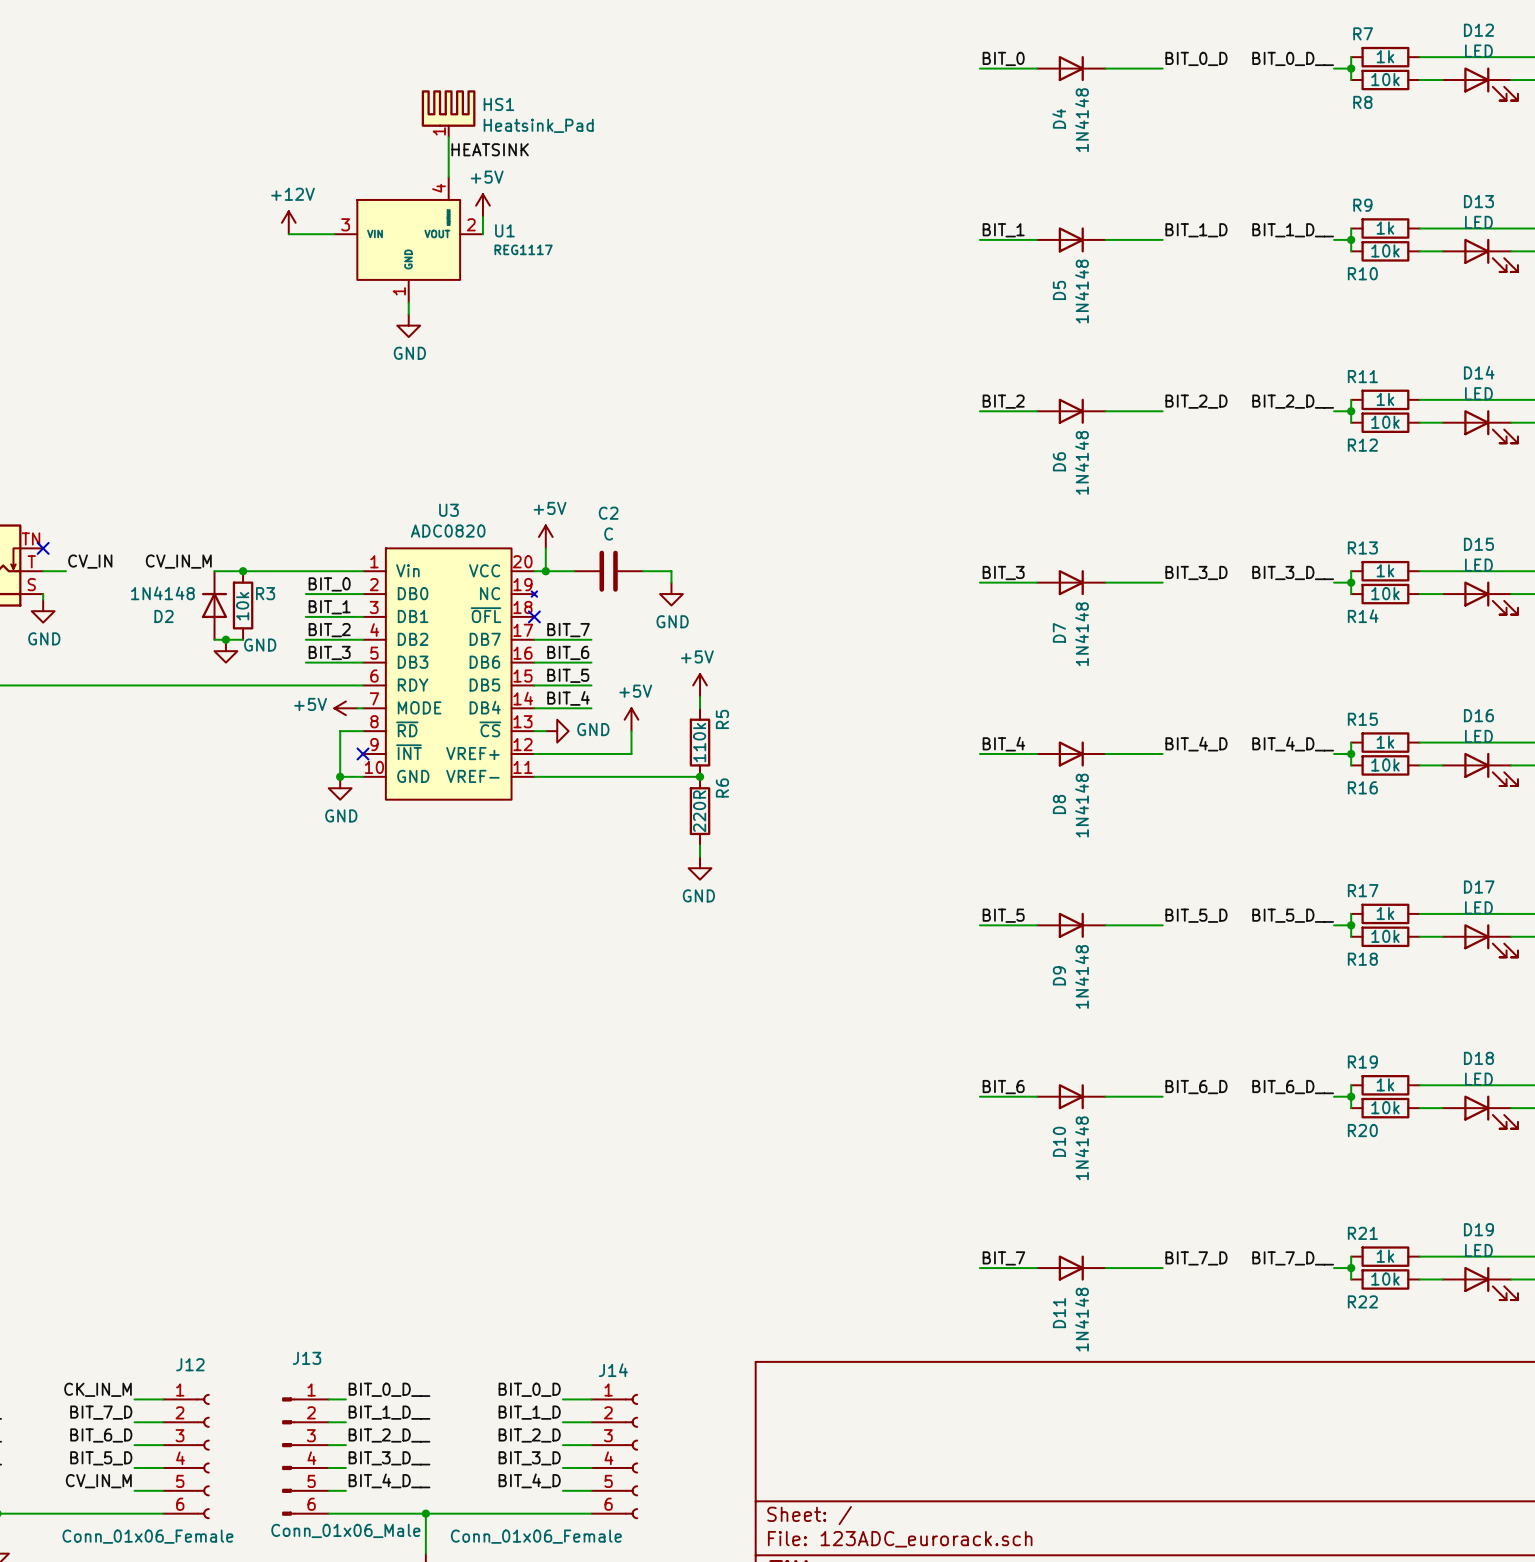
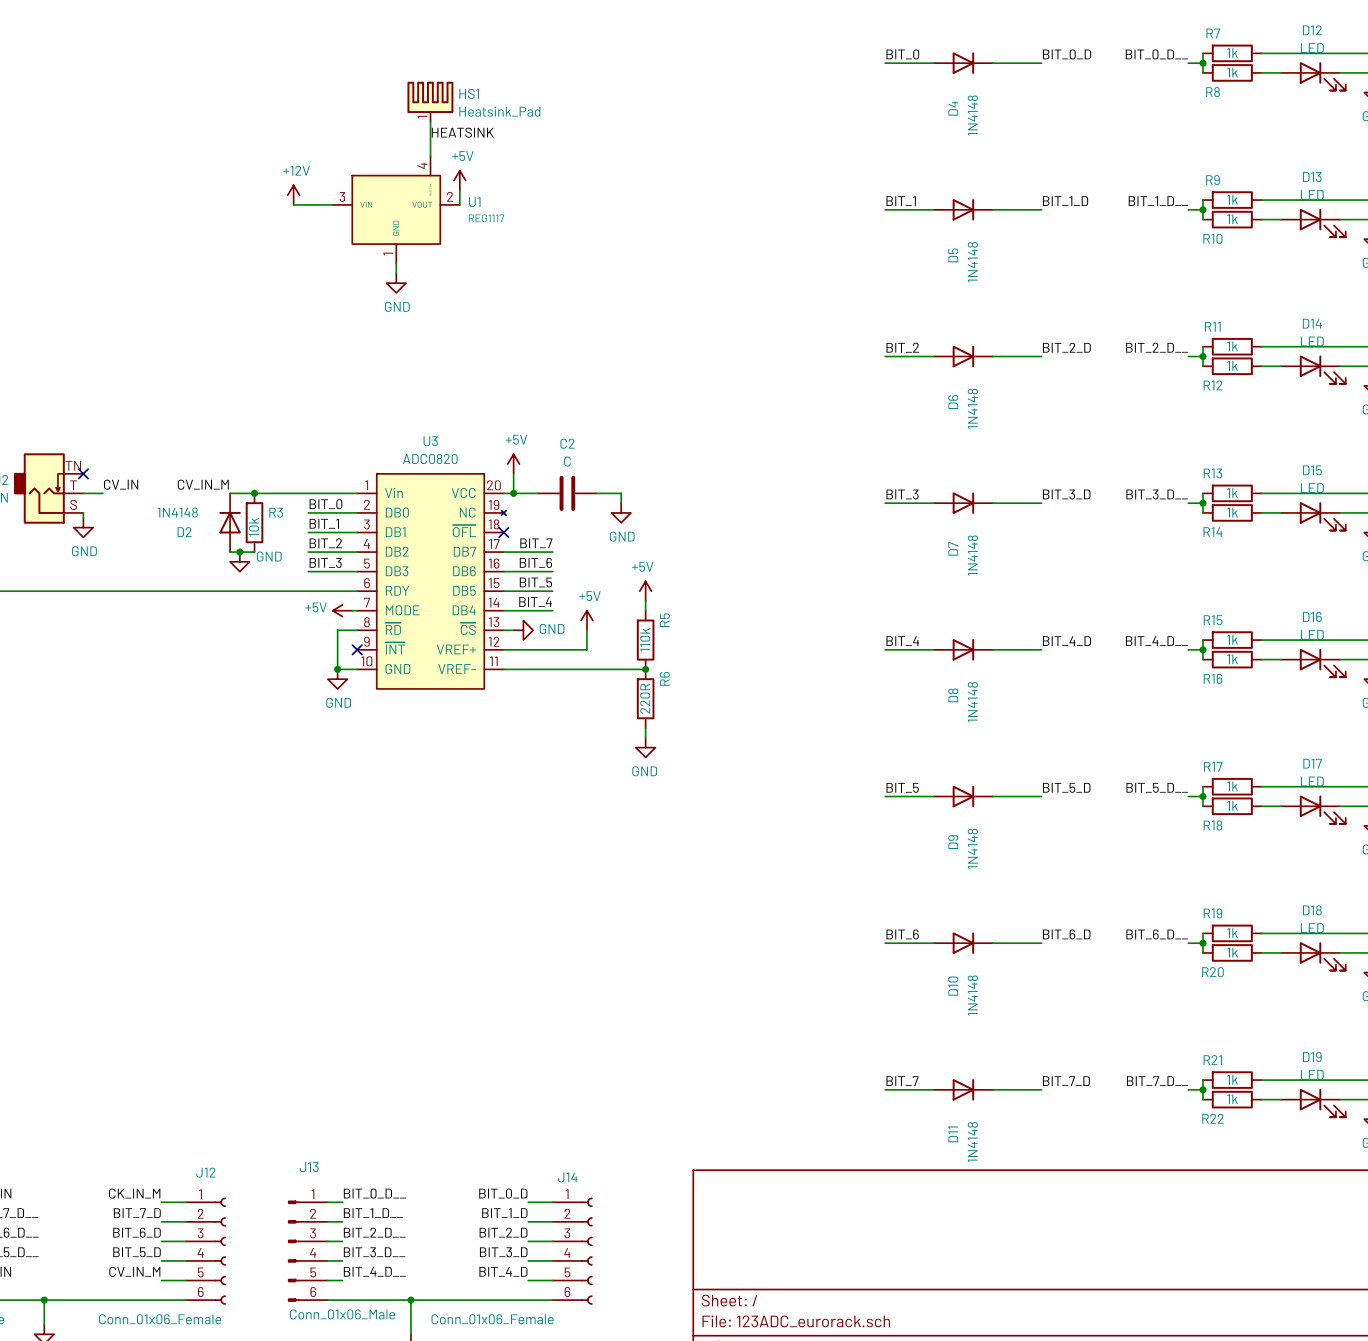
R8 value: 10k (1385, 79) -> 1k (1232, 72)
R10 value: 10k (1385, 250) -> 1k (1232, 219)
R12 value: 10k (1385, 422) -> 1k (1232, 365)
R14 value: 10k (1385, 593) -> 1k (1232, 512)
R16 value: 10k (1385, 764) -> 1k (1232, 659)
R18 value: 10k (1385, 936) -> 1k (1232, 805)
R20 value: 10k (1385, 1107) -> 1k (1232, 952)
R22 value: 10k (1385, 1279) -> 1k (1232, 1099)

